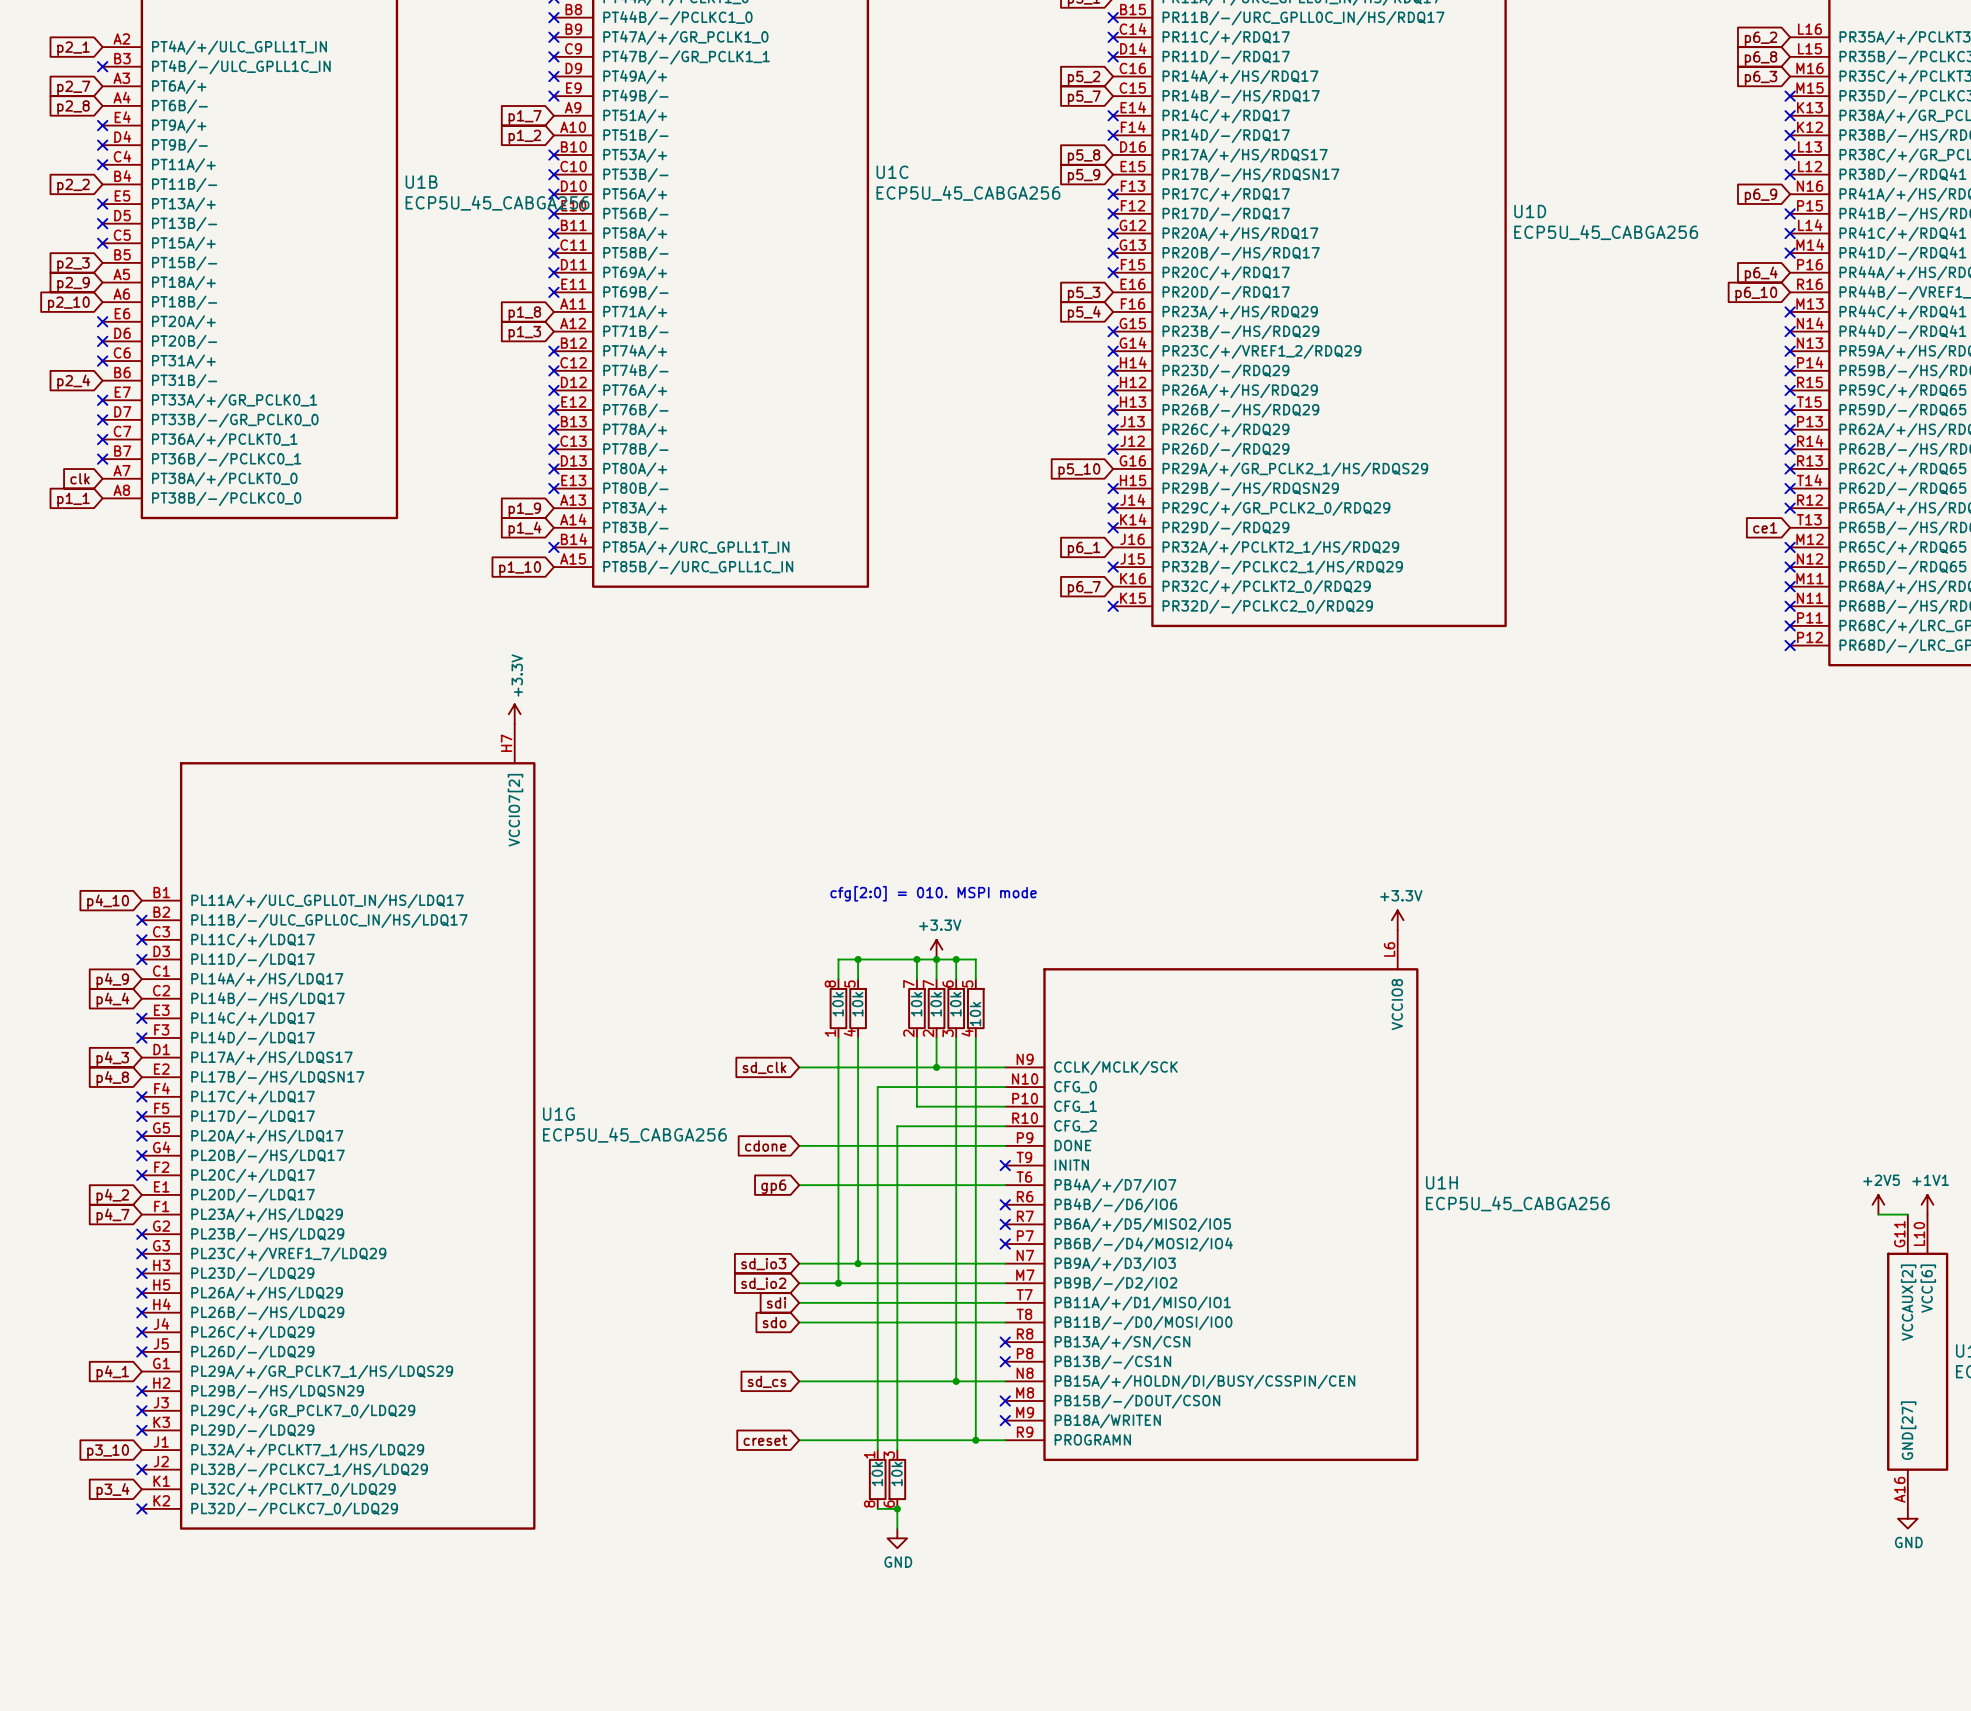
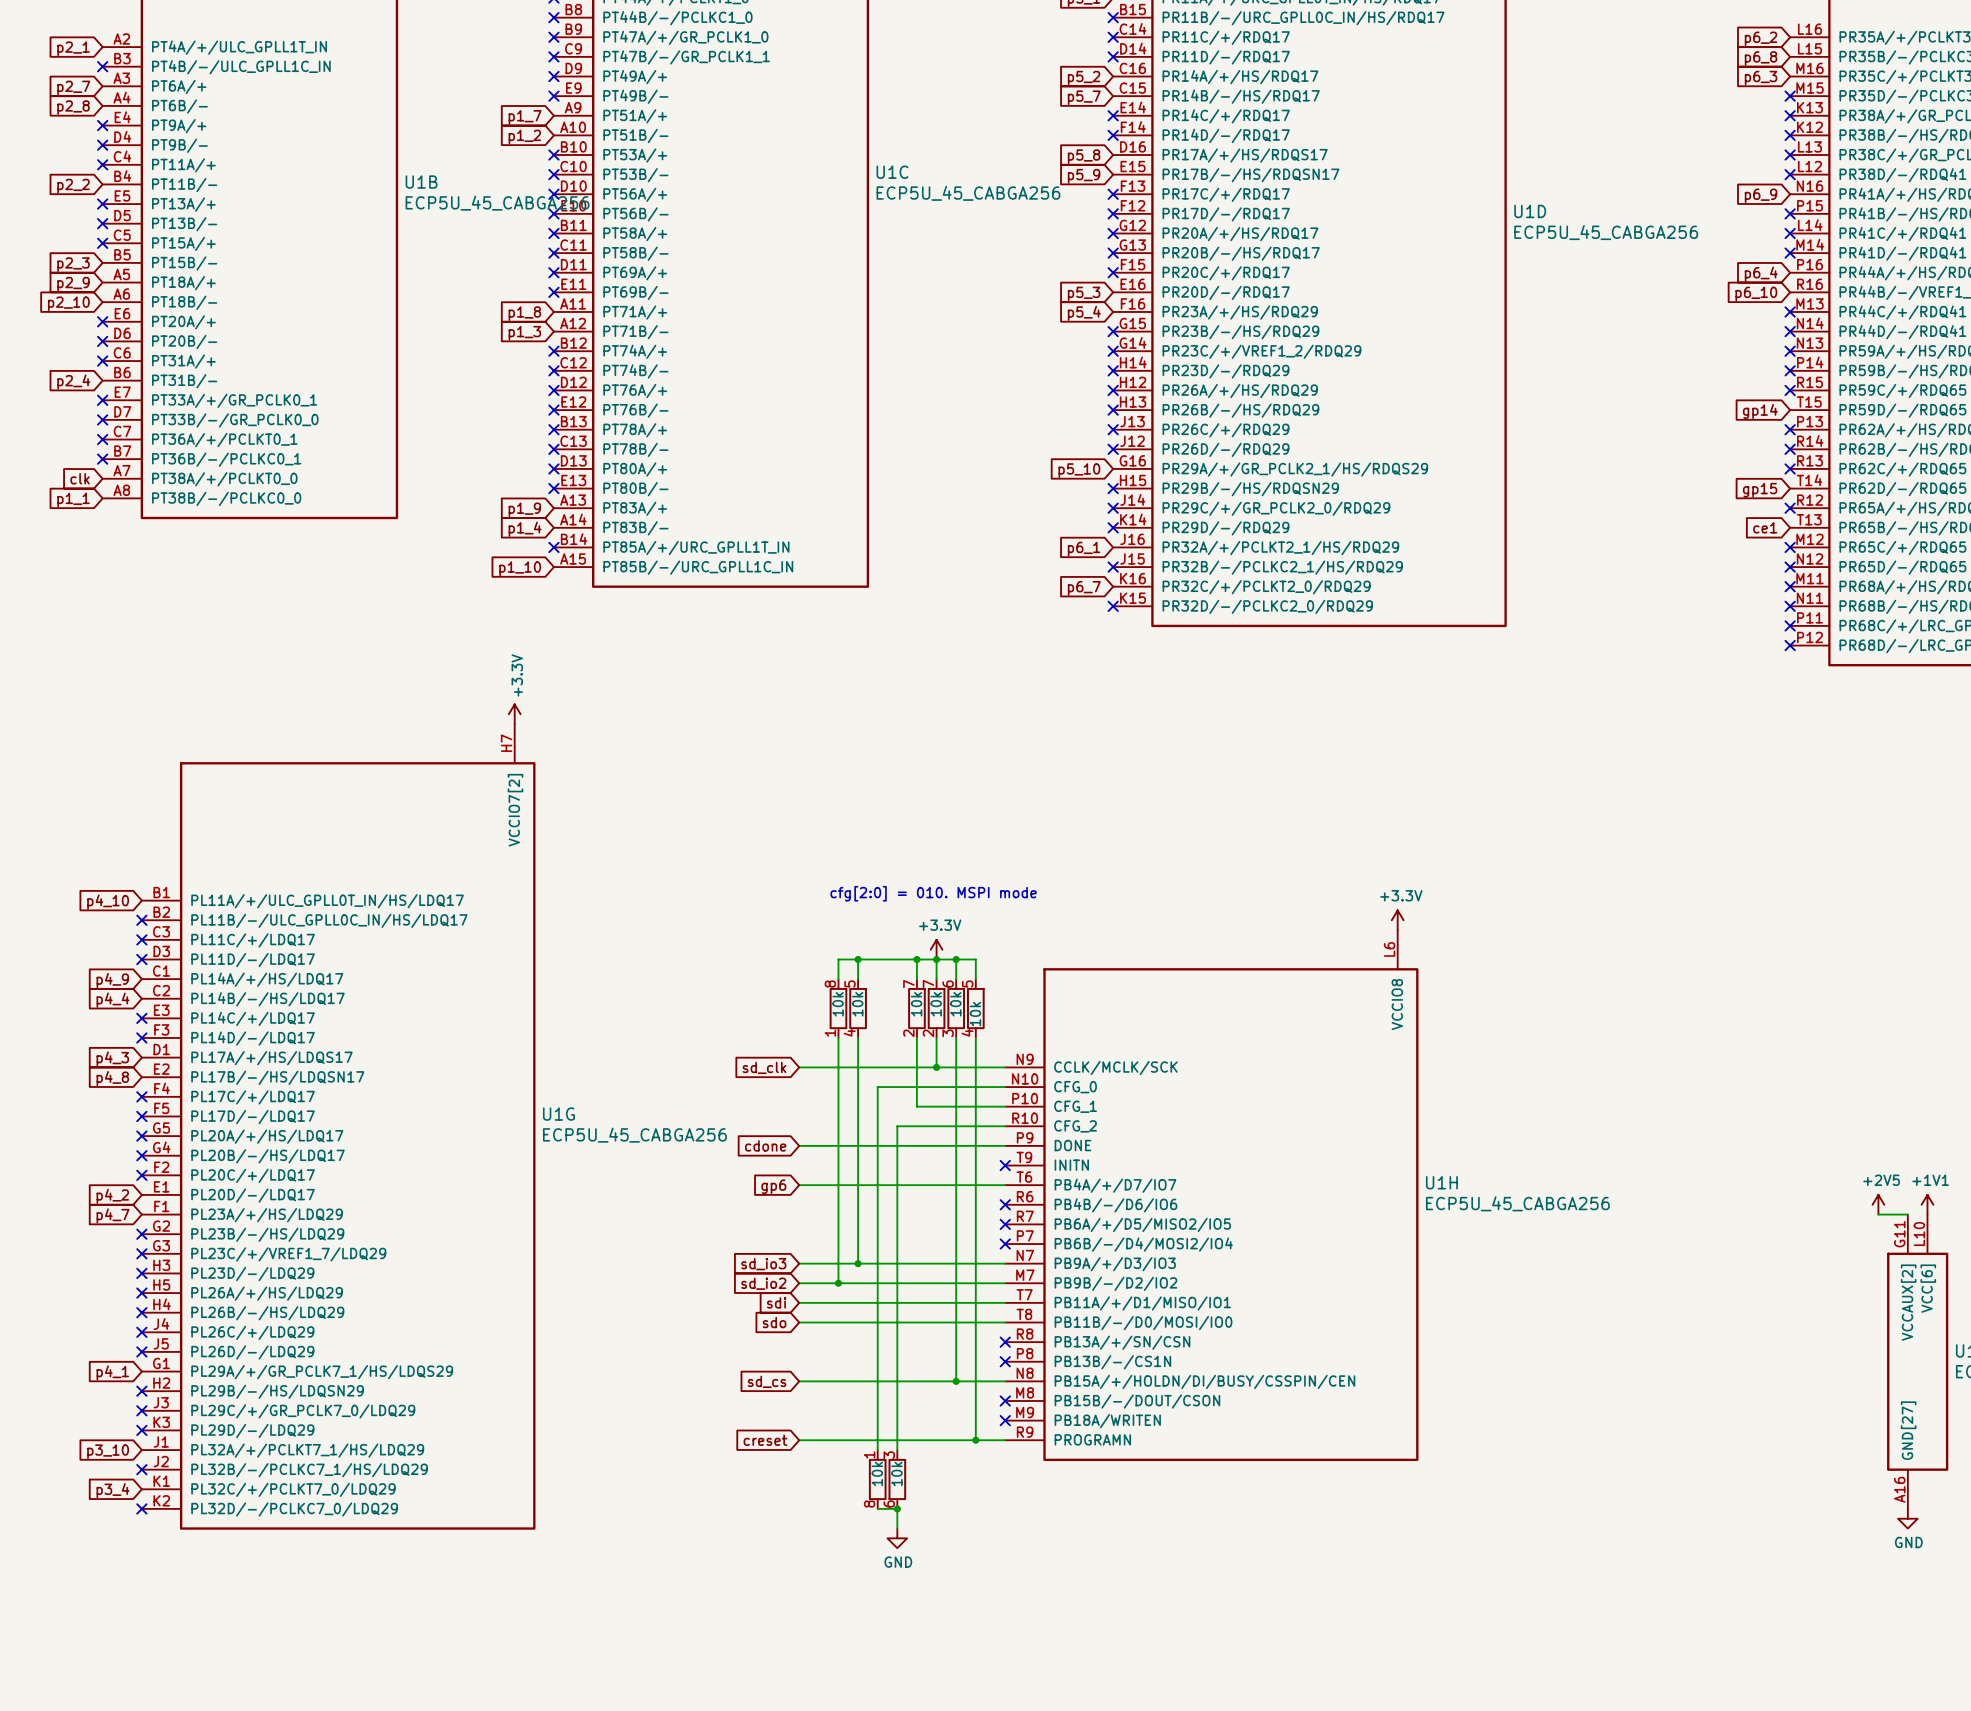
no-connect mark: (1790, 410) -> none
global label: none -> gp14 (1760, 411)
no-connect mark: (1790, 488) -> none
global label: none -> gp15 (1760, 490)

